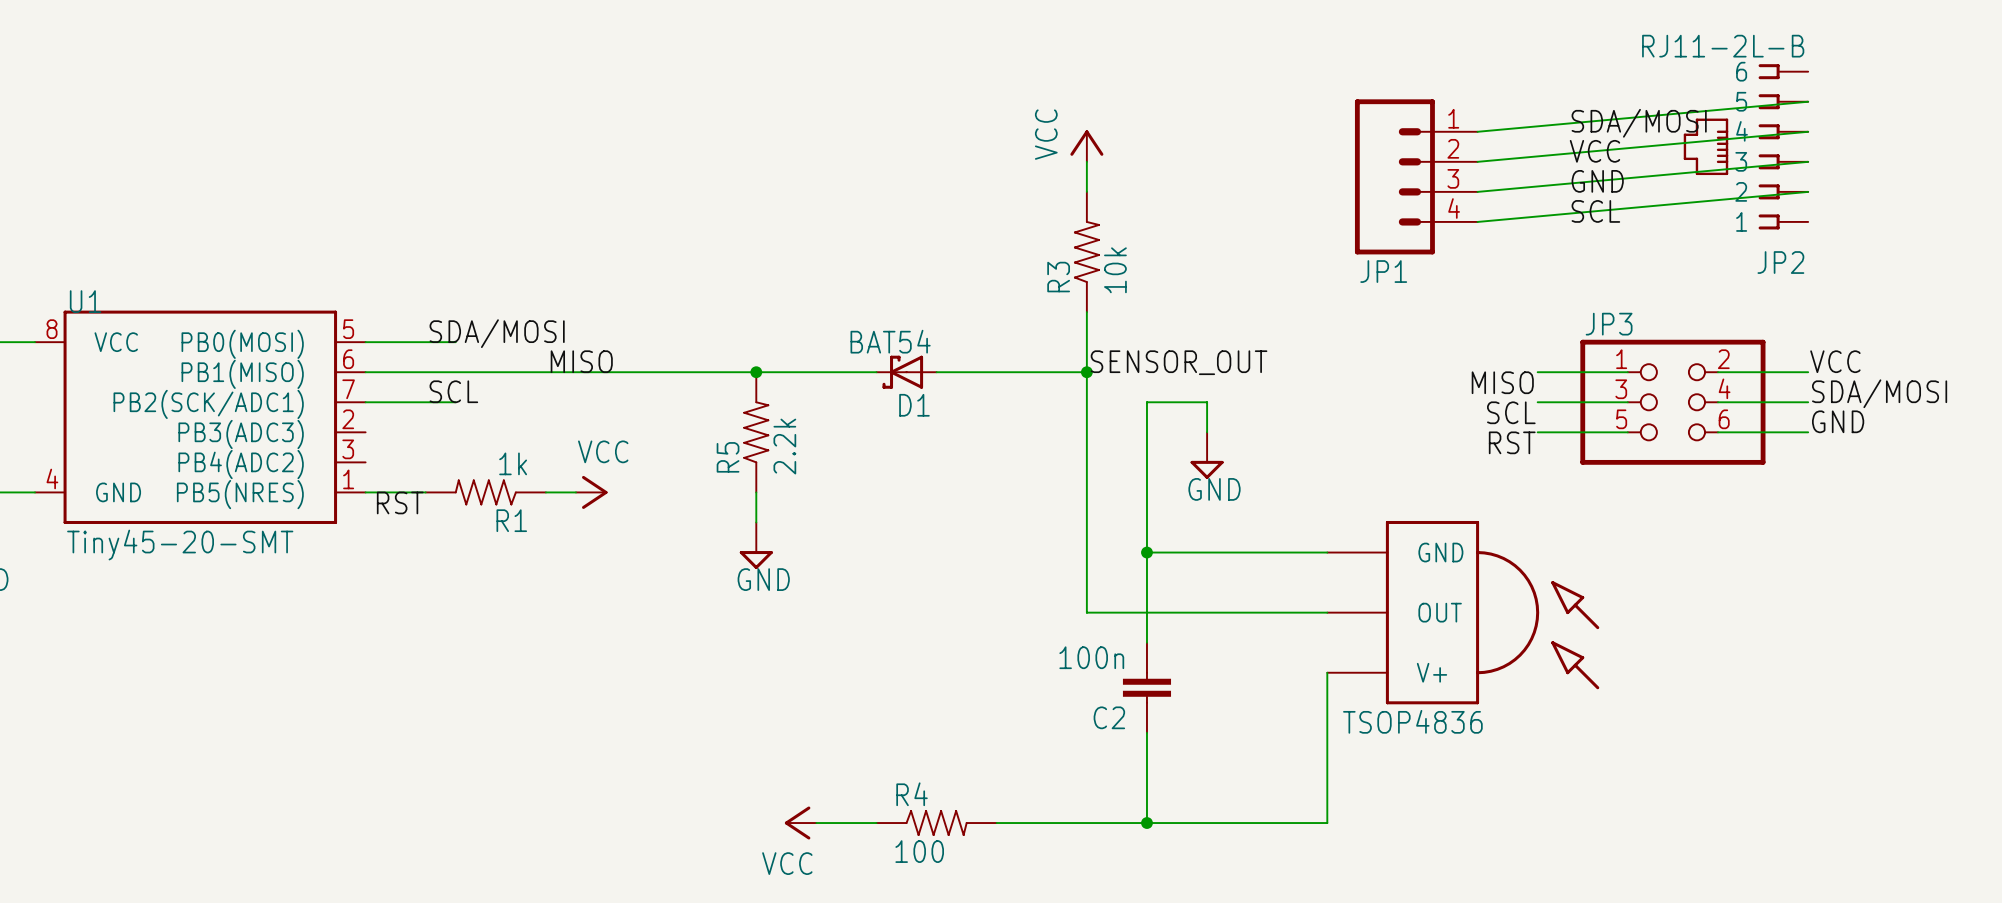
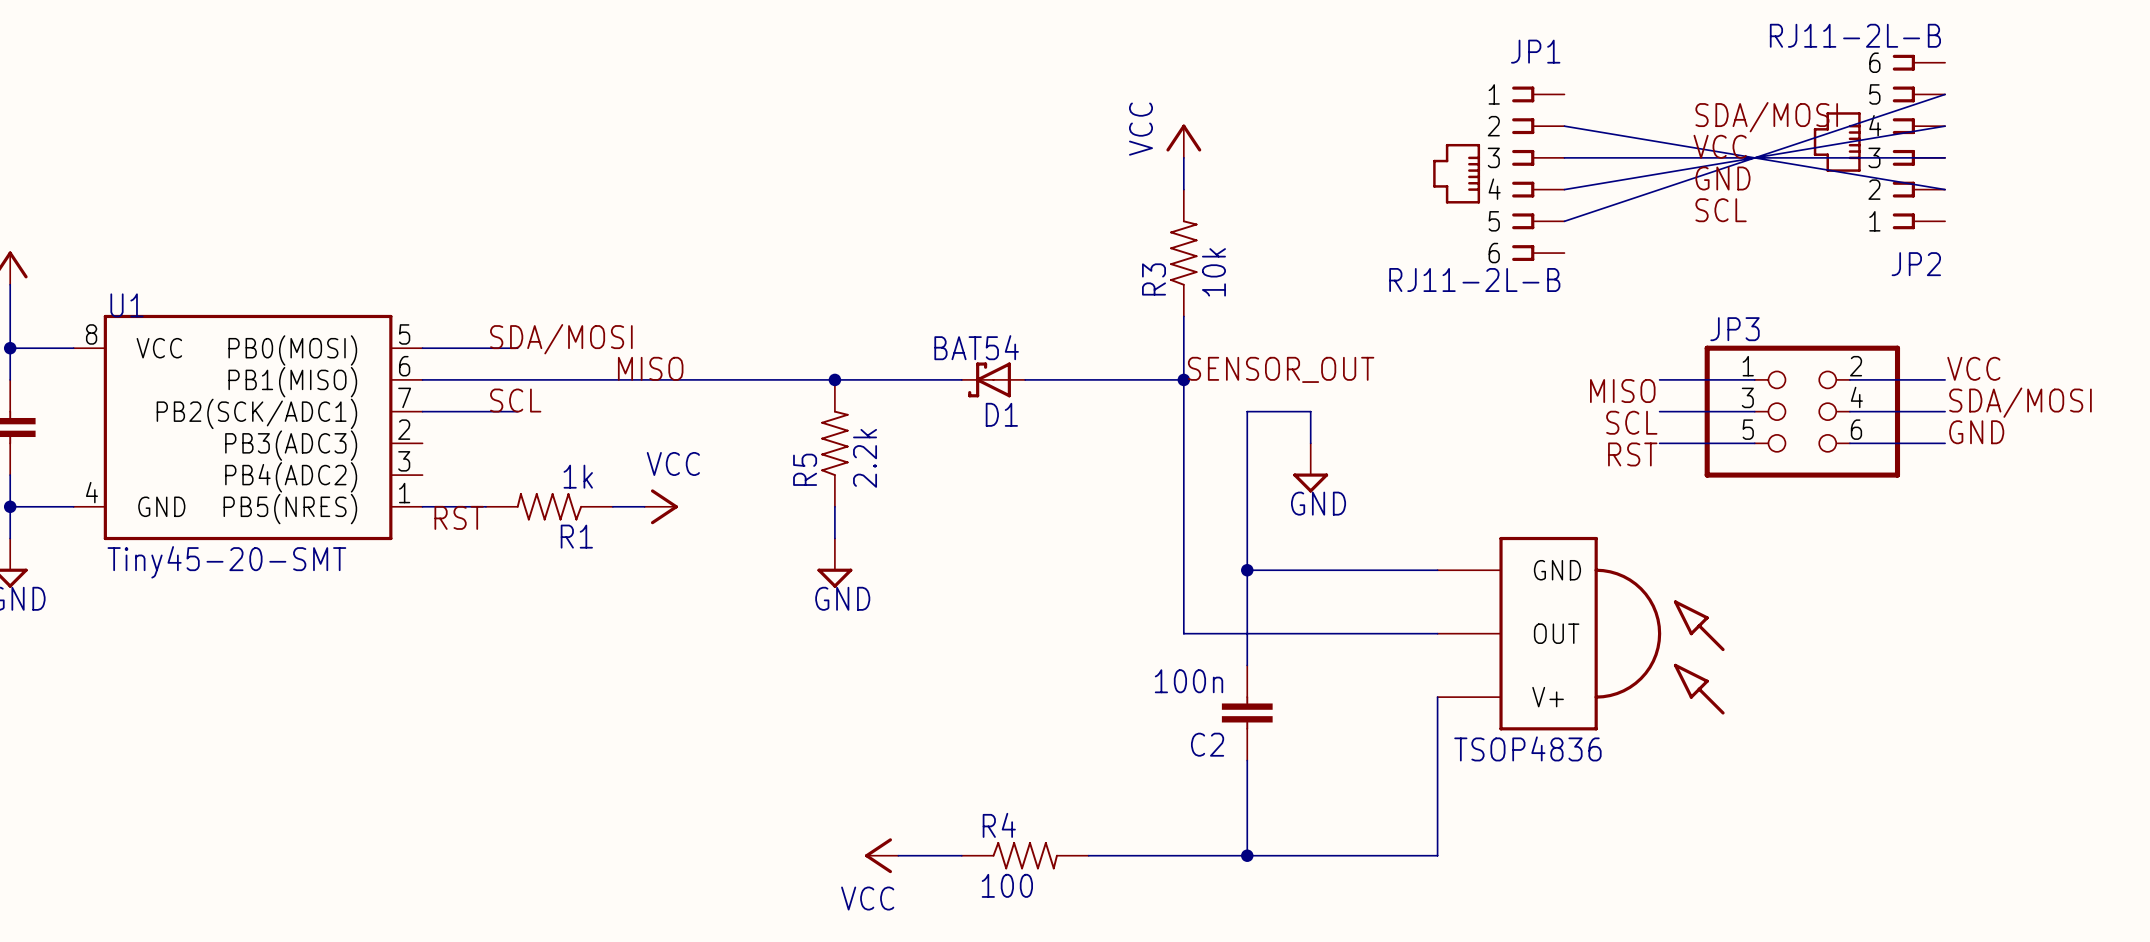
JP1 symbol: [1354, 99, 1478, 255] -> [1433, 86, 1565, 261]
wire: (1808, 101) (1477, 131) -> (1945, 94) (1564, 221)
wire: (1808, 131) (1477, 161) -> (1945, 126) (1564, 189)
wire: (1808, 161) (1477, 191) -> (1945, 157) (1564, 157)
wire: (1808, 191) (1477, 221) -> (1945, 189) (1564, 126)
JP1 name position: JP1 (1383, 271) -> JP1 (1535, 51)
JP1 value: none -> RJ11-2L-B (1474, 280)

